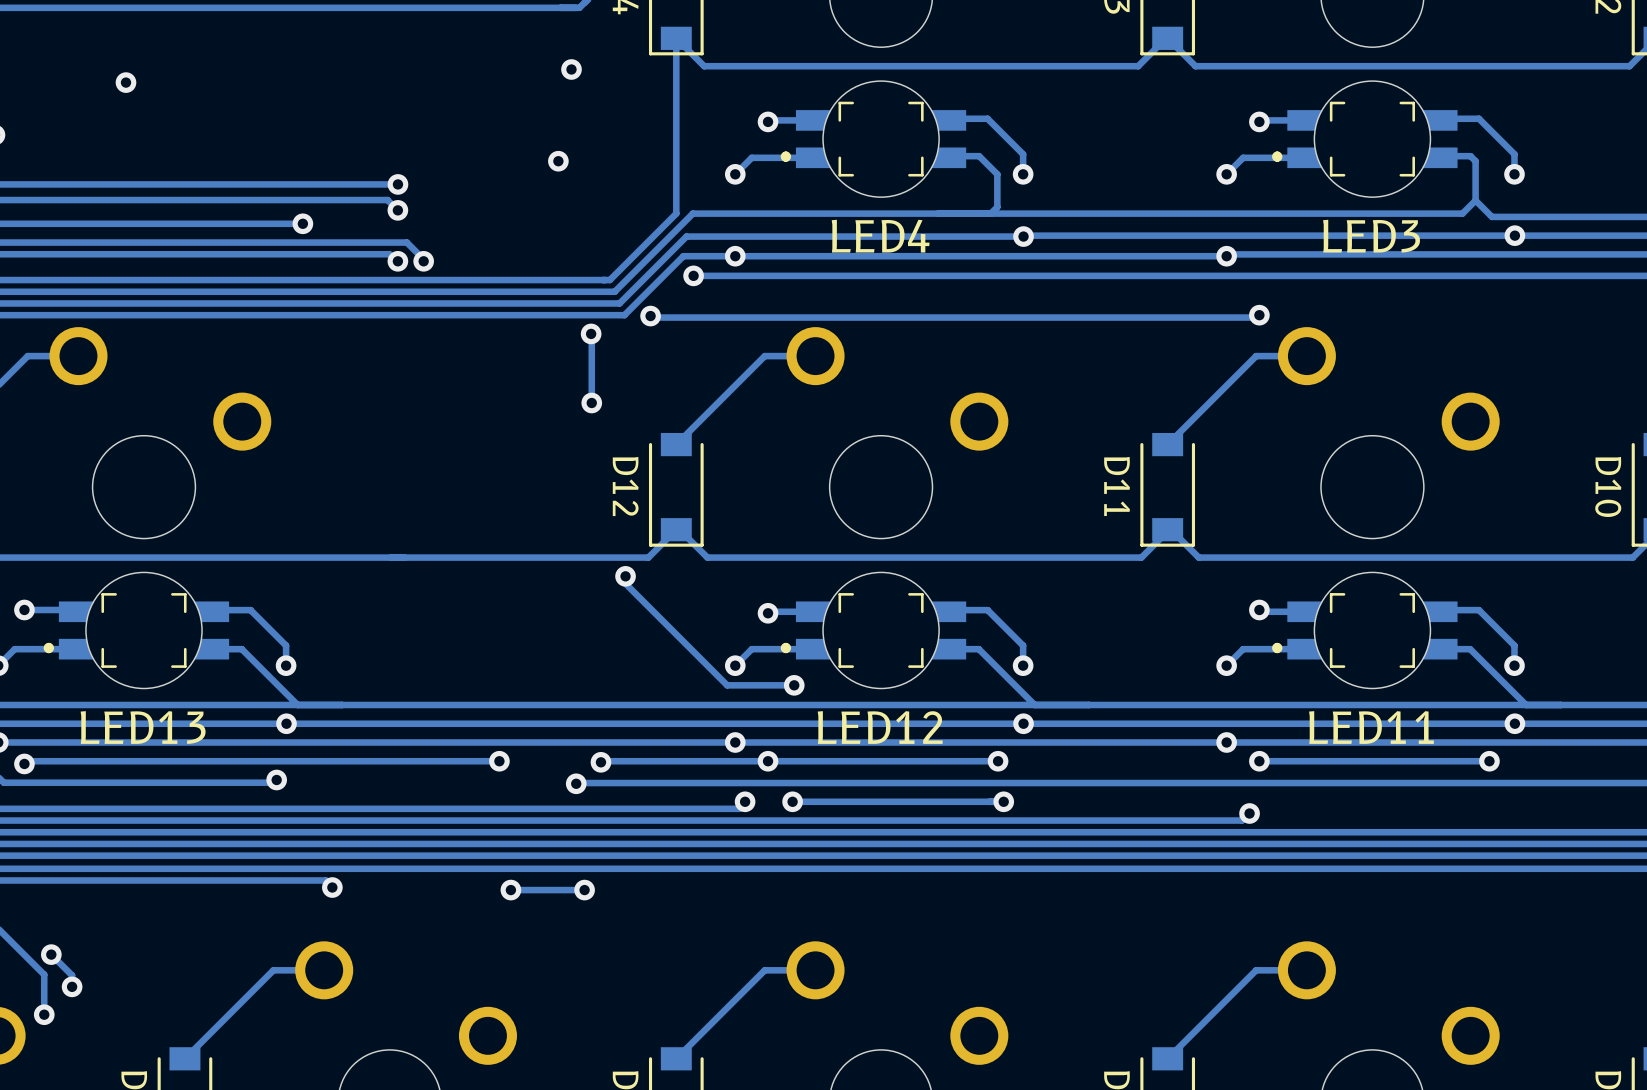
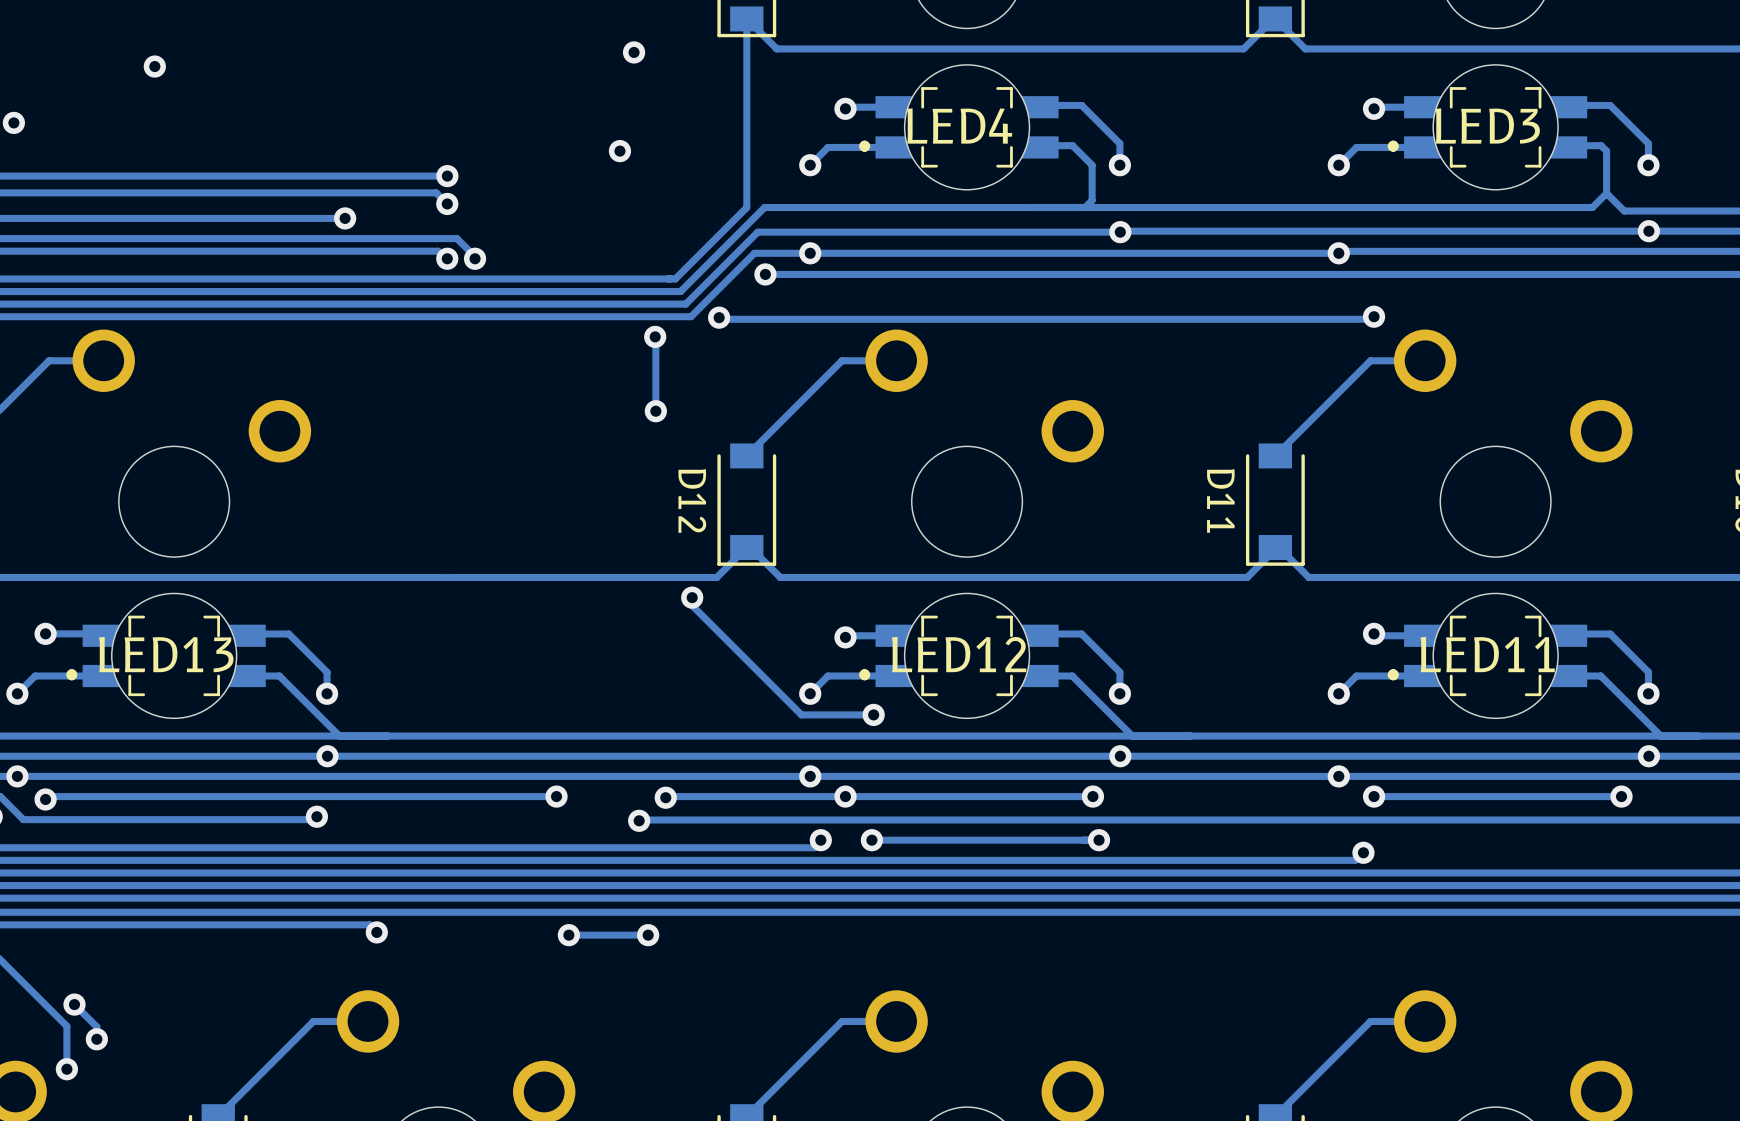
LED4 name position: LED4 (880, 236) -> LED4 (959, 126)
LED3 name position: LED3 (1371, 236) -> LED3 (1487, 126)
LED13 name position: LED13 (143, 727) -> LED13 (166, 654)
LED12 name position: LED12 (880, 727) -> LED12 (959, 654)
LED11 name position: LED11 (1371, 727) -> LED11 (1487, 654)

